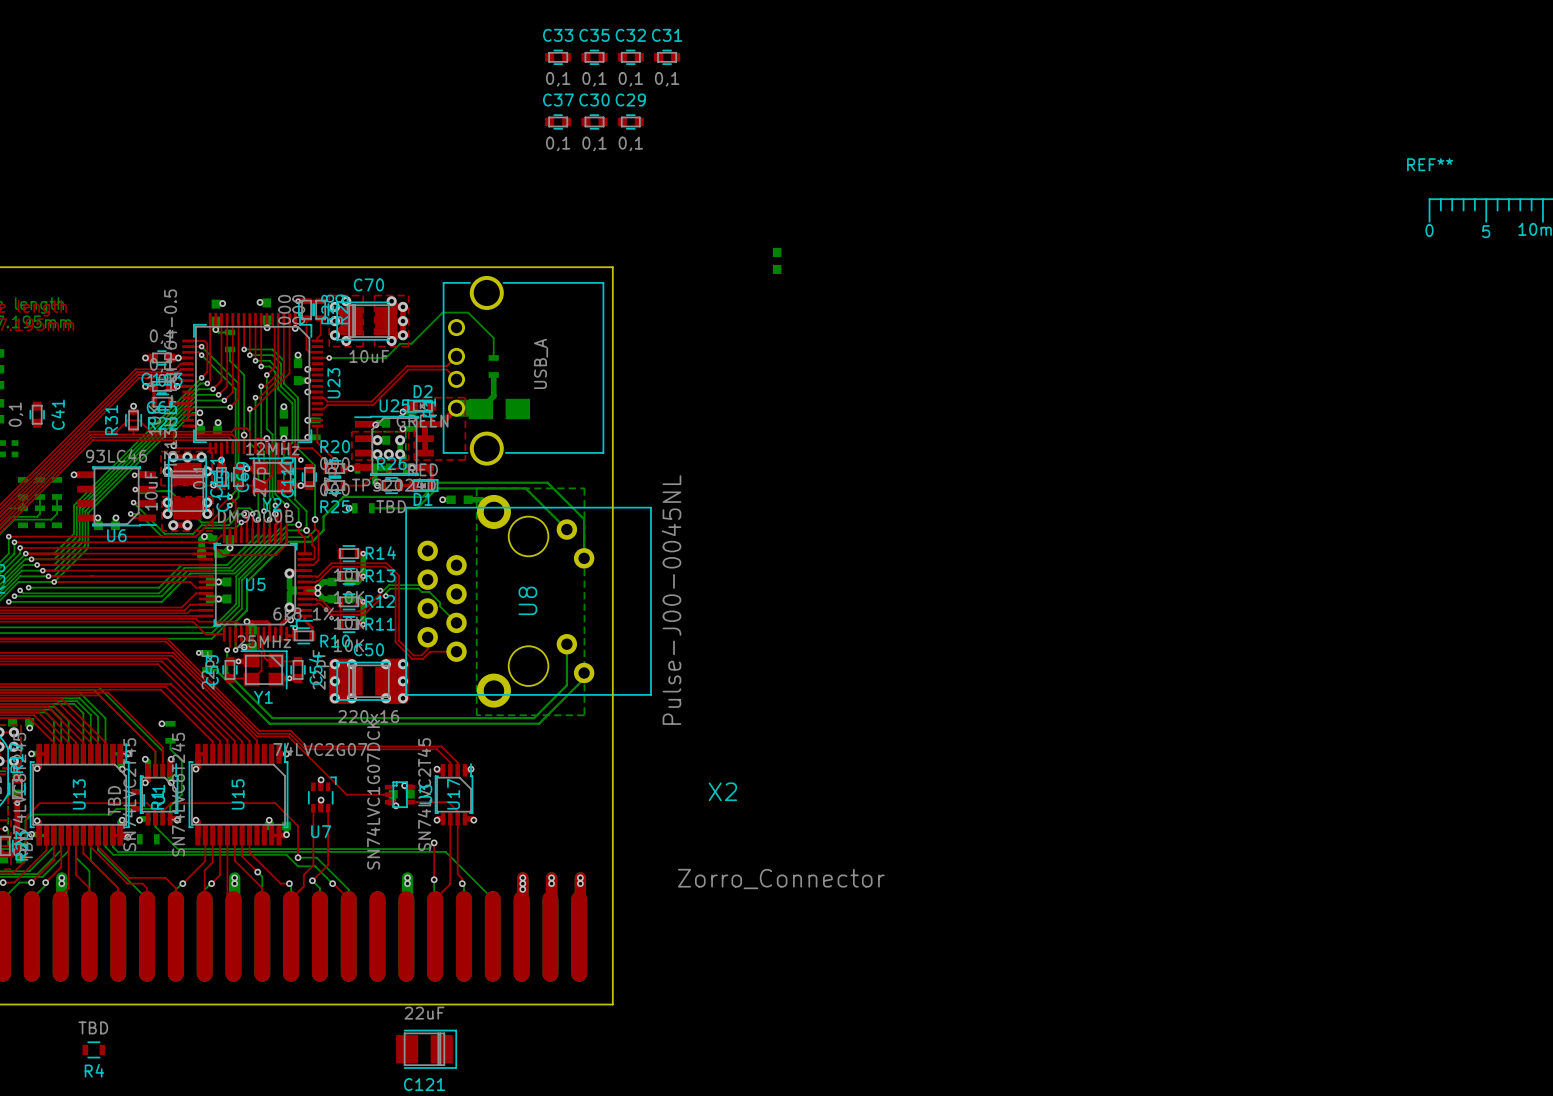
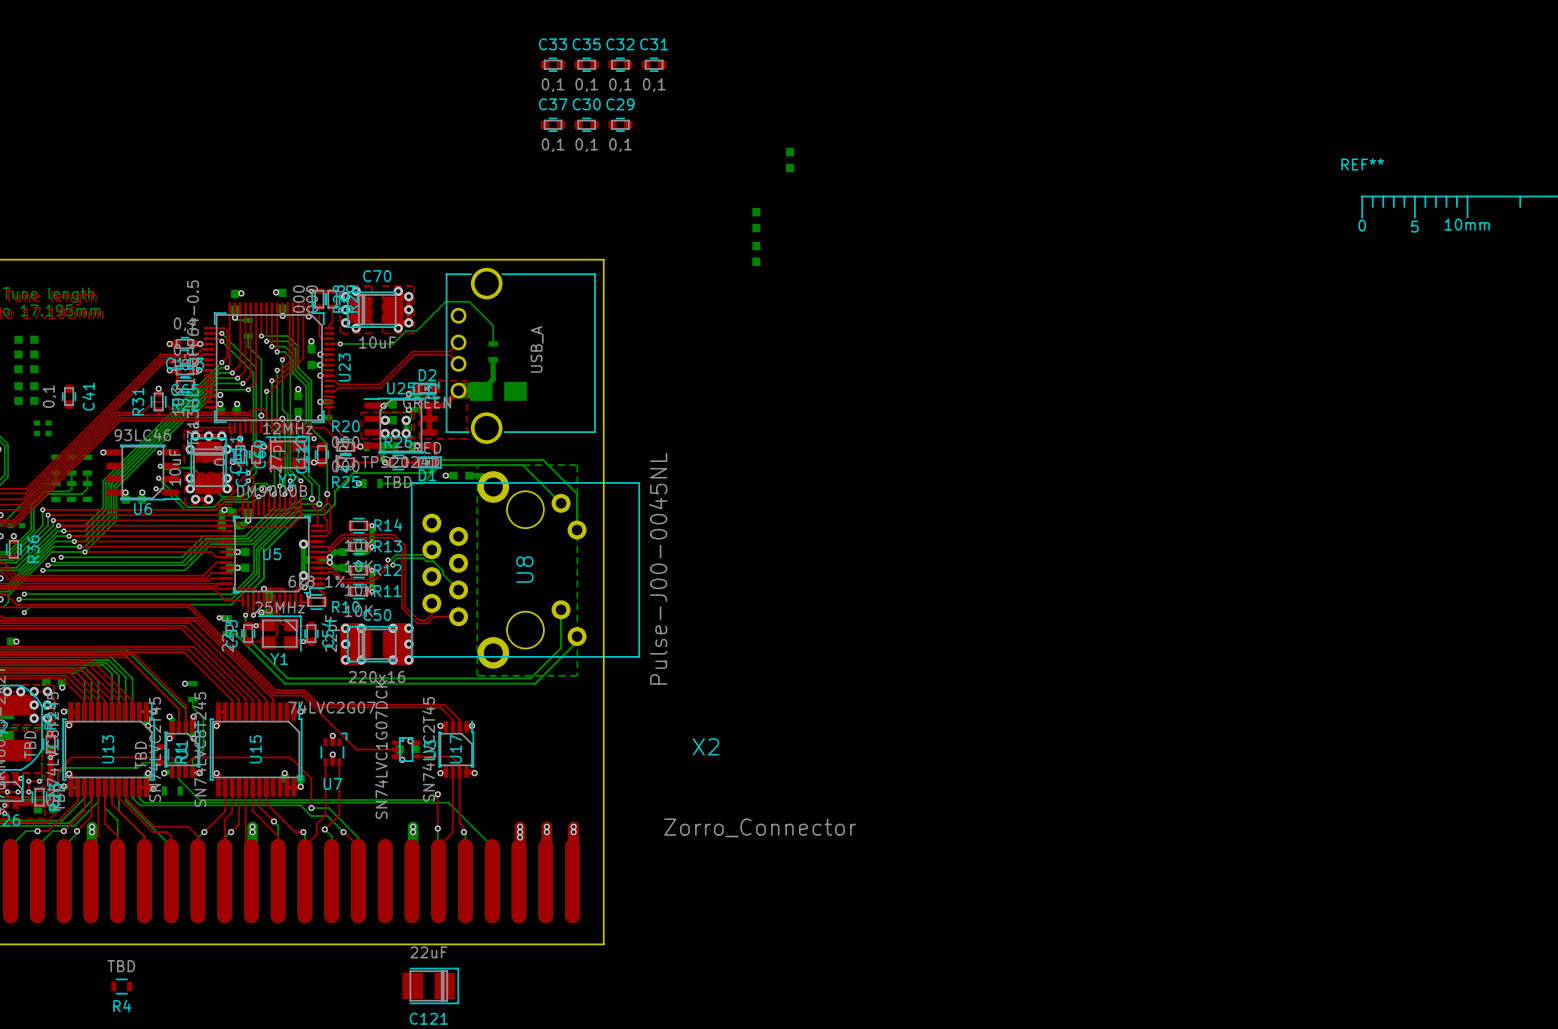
part: none -> (790, 160)
part: none -> (756, 220)

